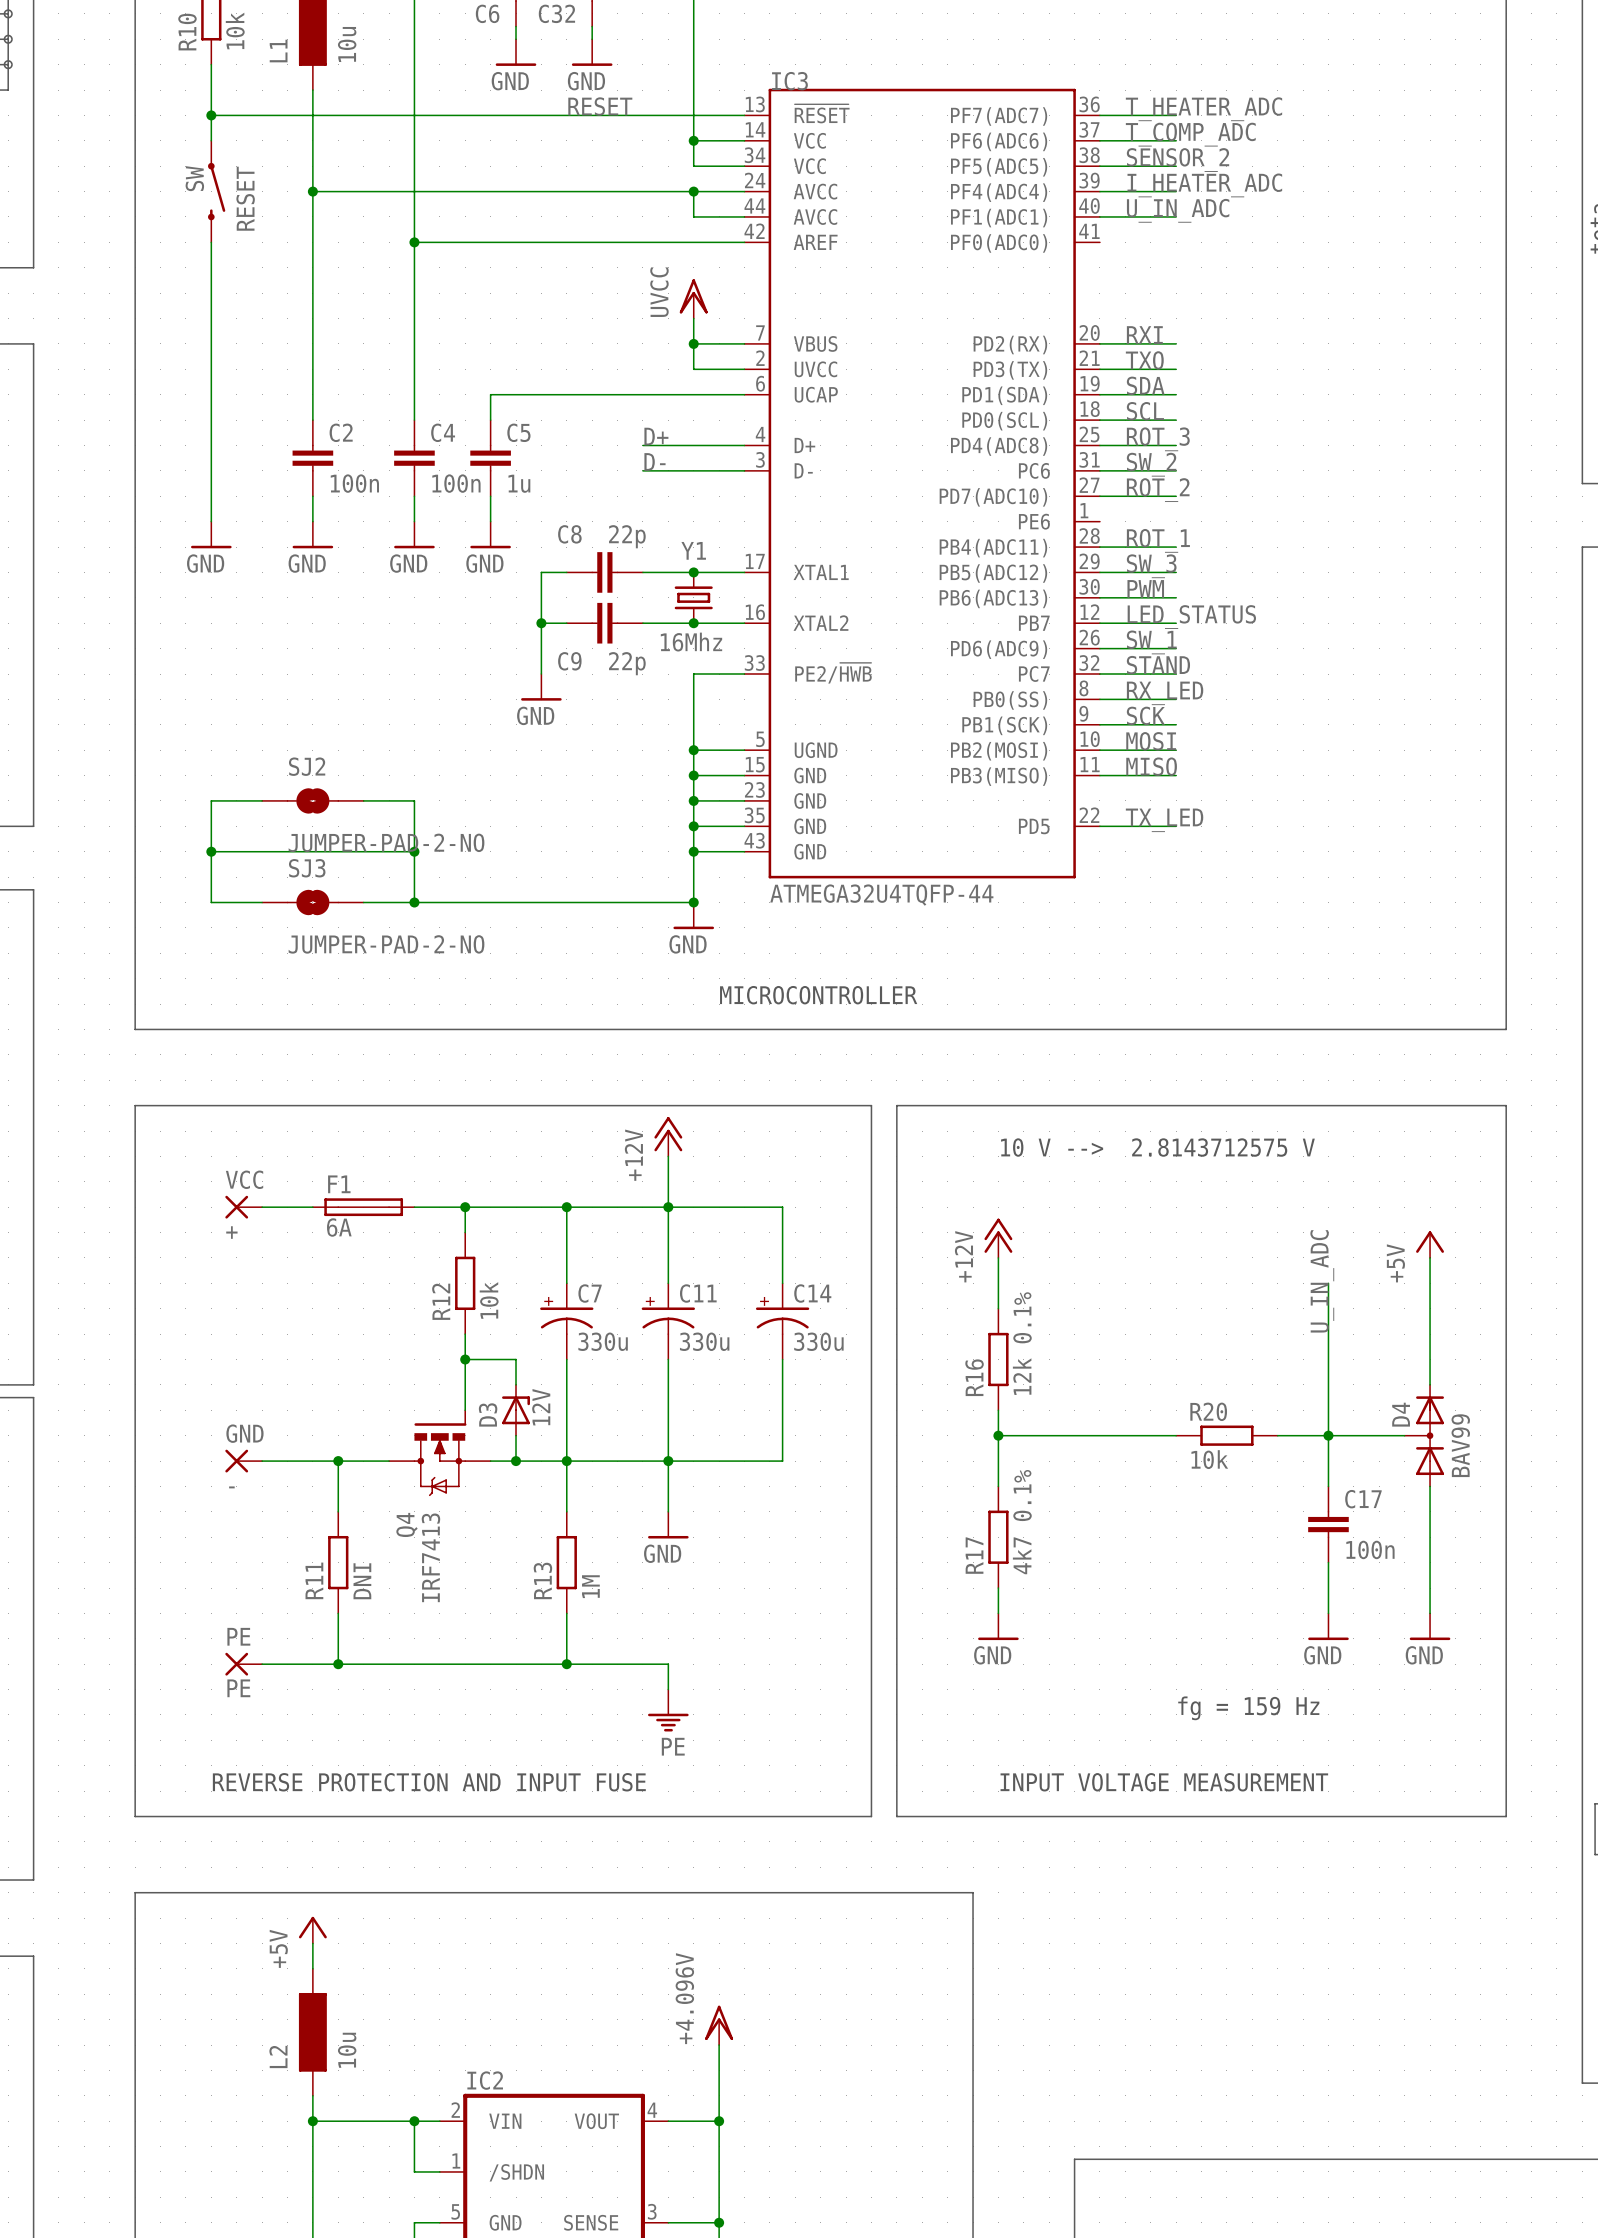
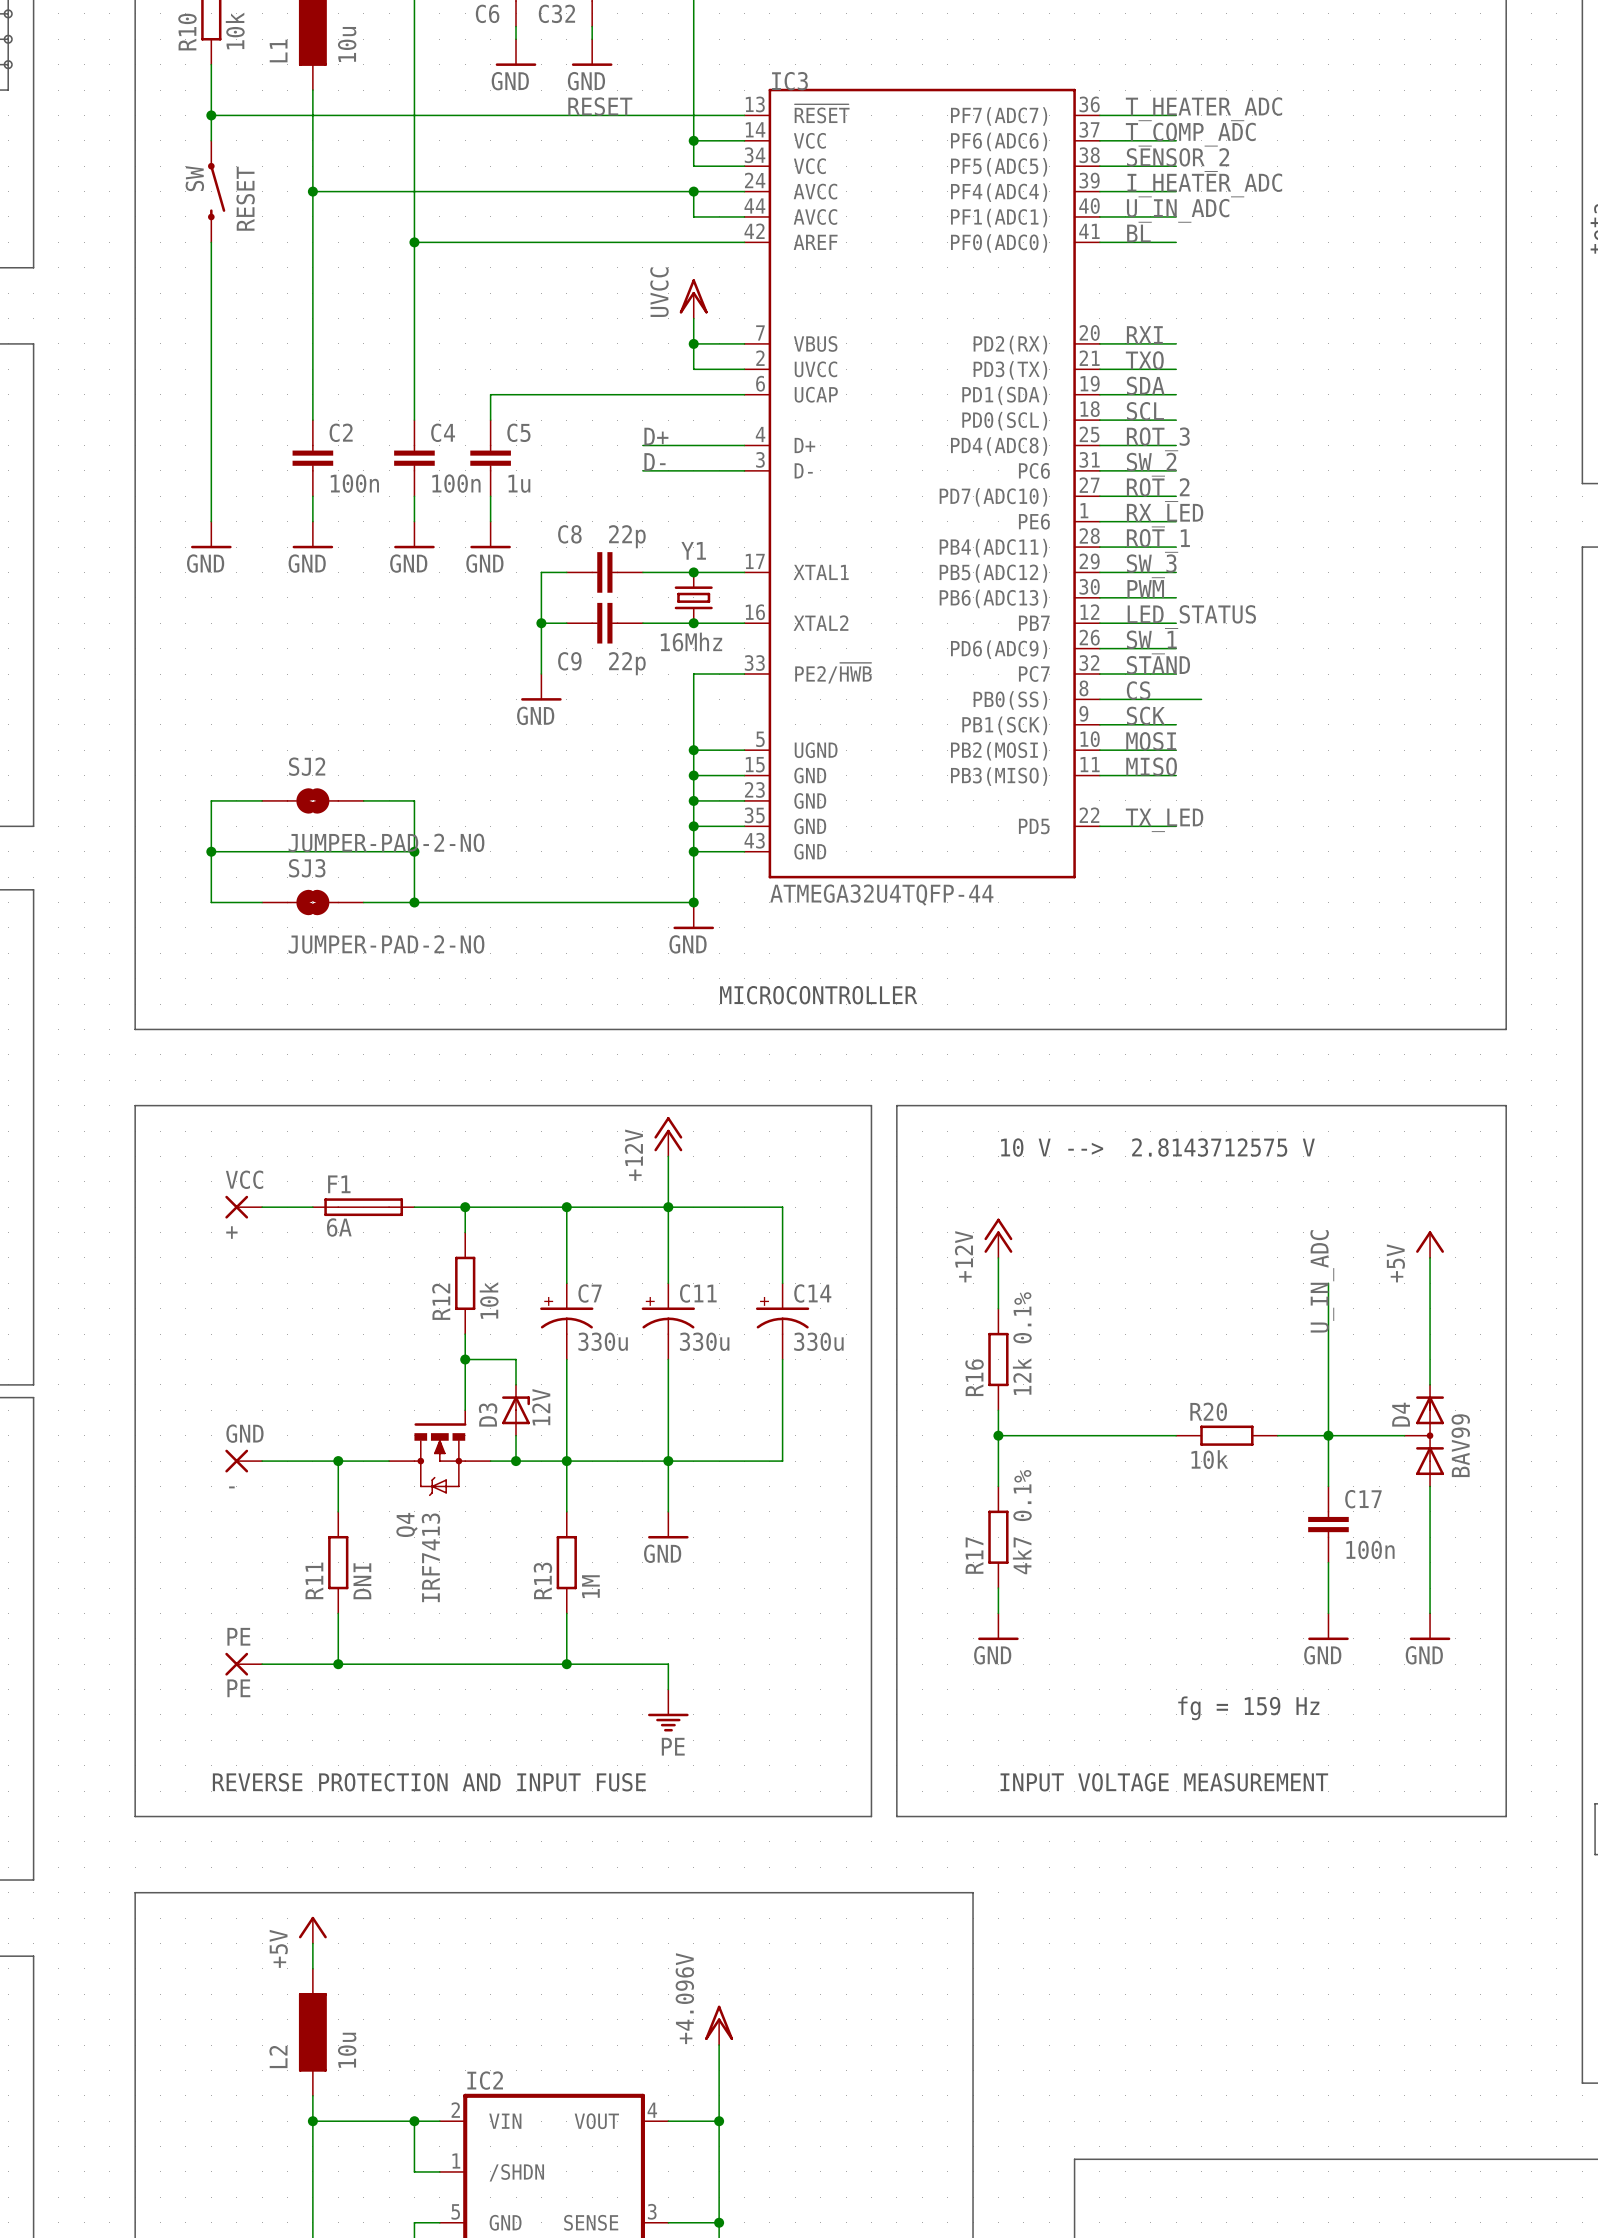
label: none -> BL (1138, 233)
wire: none -> (1099, 242) (1176, 242)
label: none -> RX_LED (1165, 515)
wire: none -> (1099, 521) (1176, 521)
label: RX_LED (1165, 693) -> CS (1138, 690)
wire: none -> (1176, 699) (1201, 699)

